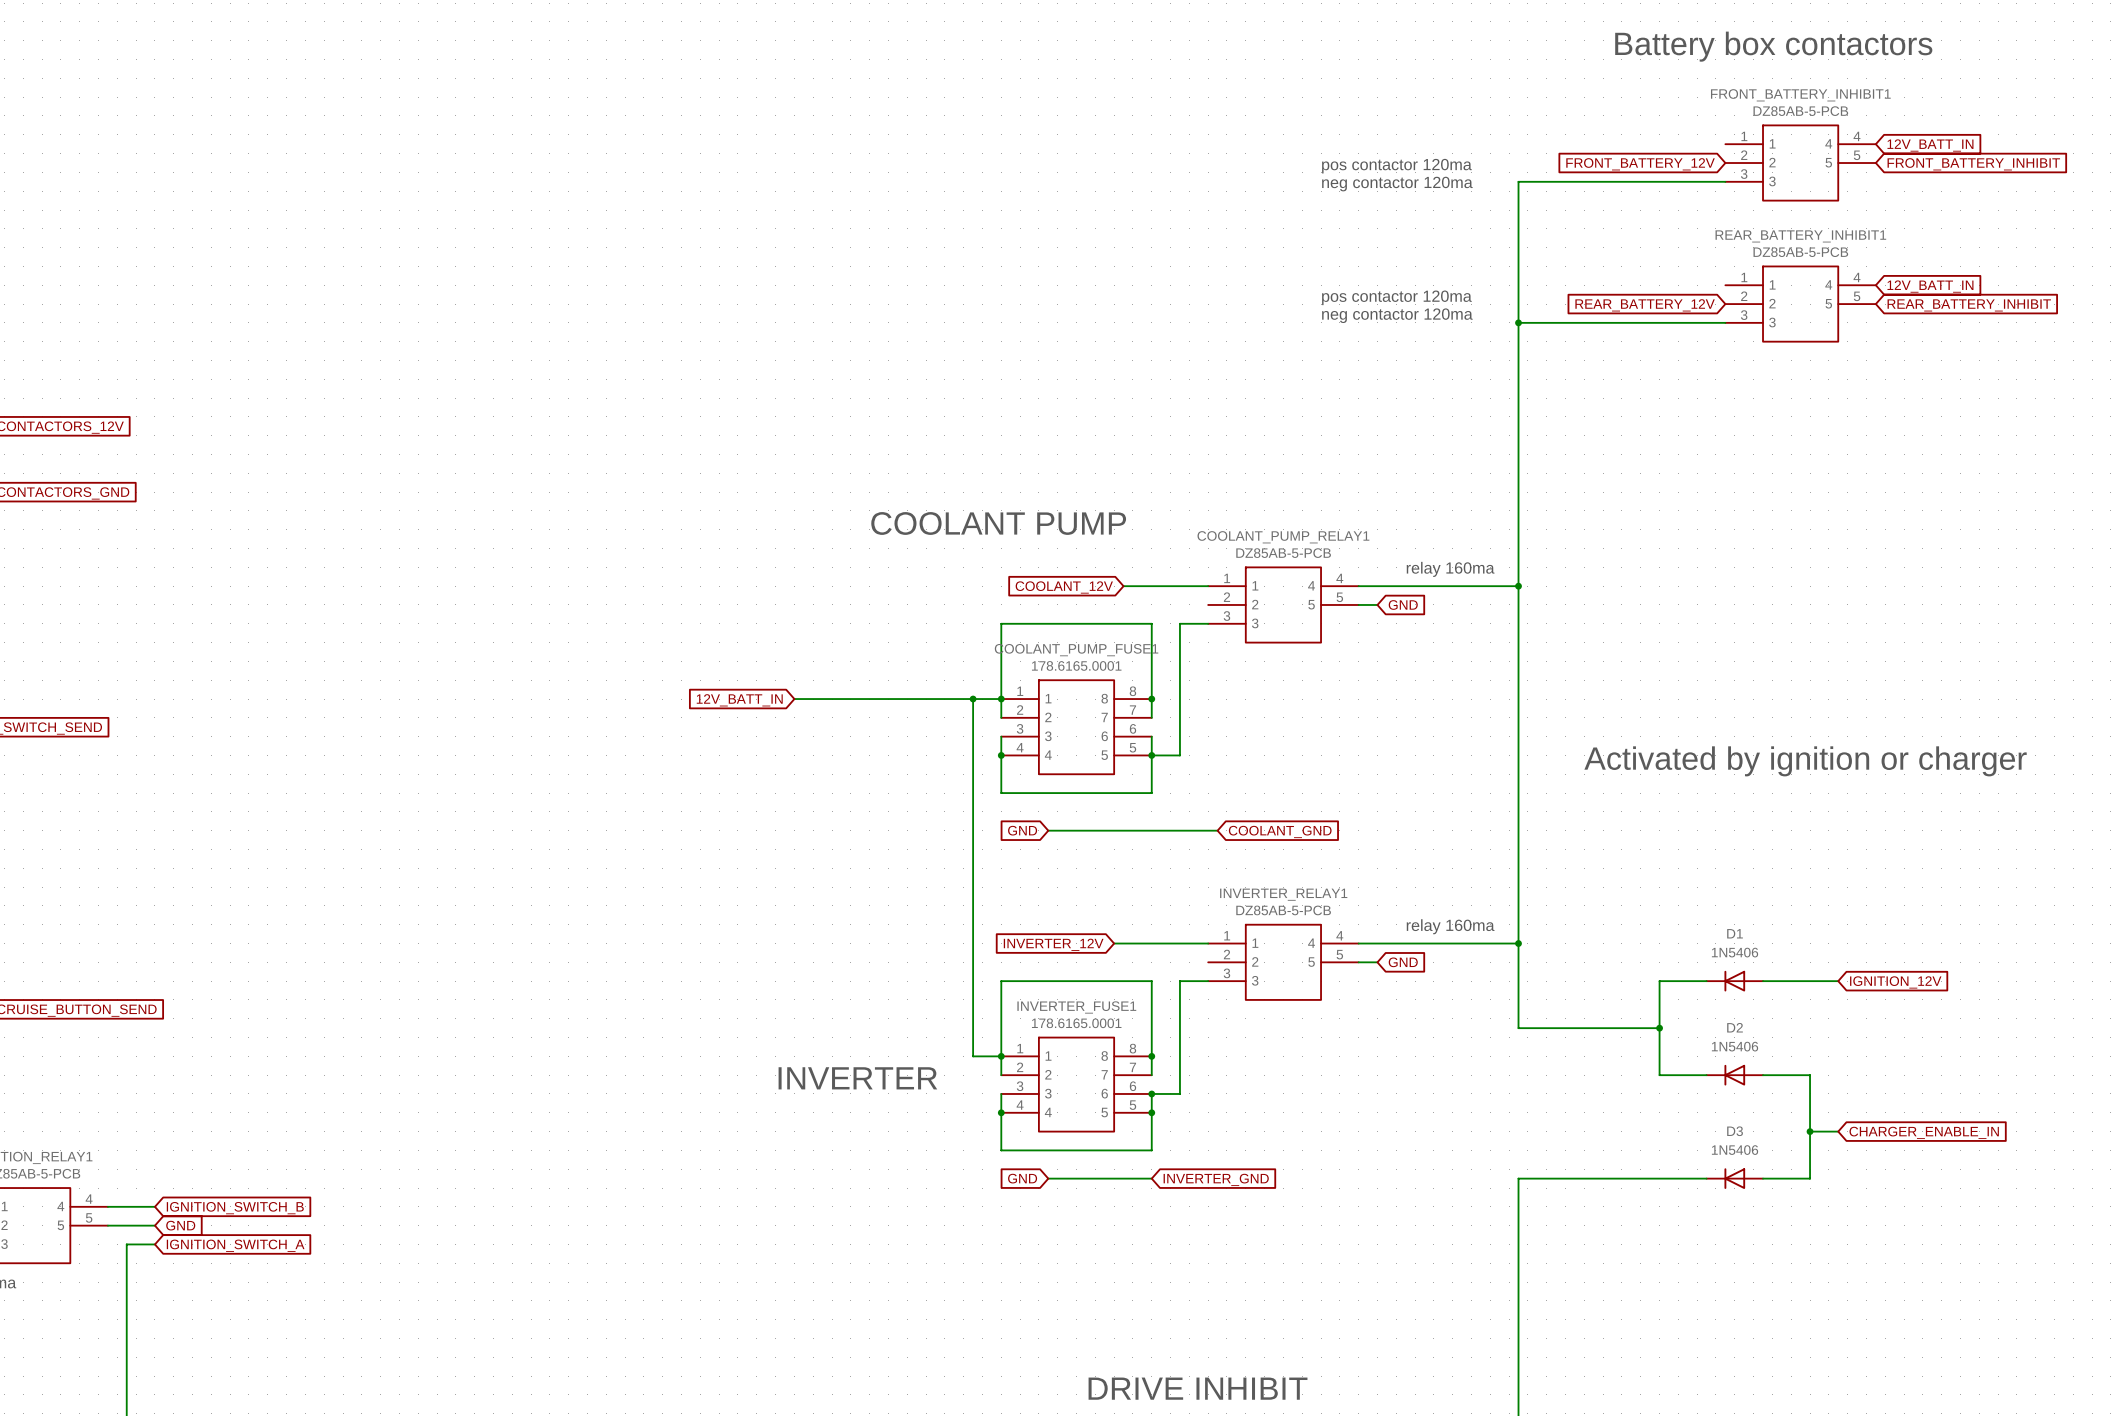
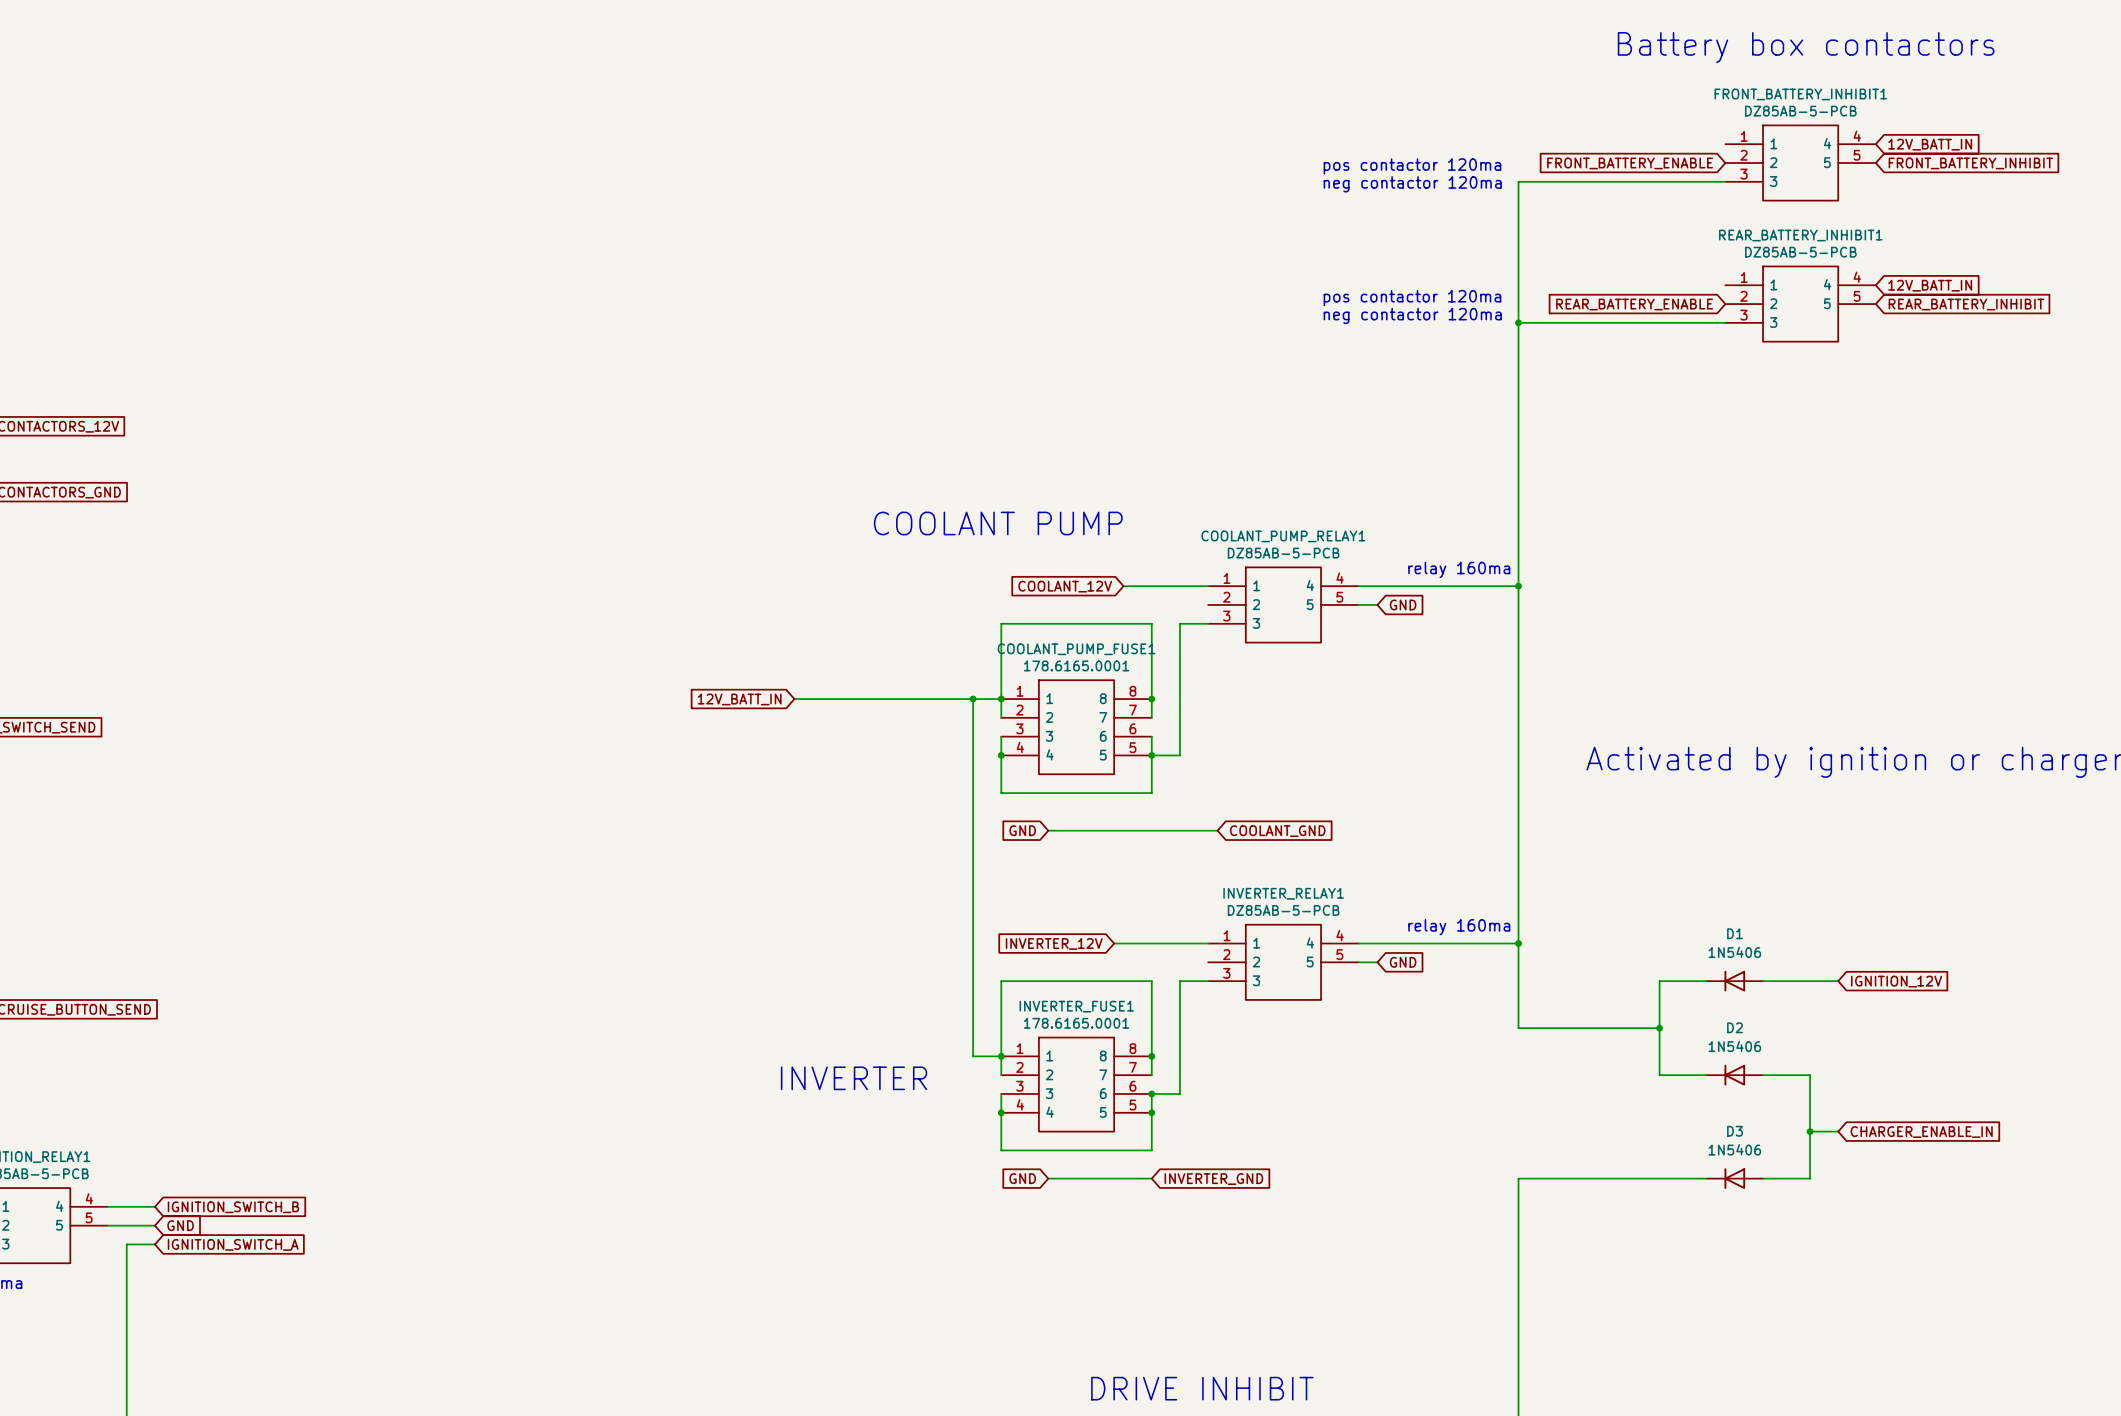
global label: FRONT_BATTERY_12V (1640, 164) -> FRONT_BATTERY_ENABLE (1630, 163)
global label: REAR_BATTERY_12V (1645, 305) -> REAR_BATTERY_ENABLE (1634, 304)

